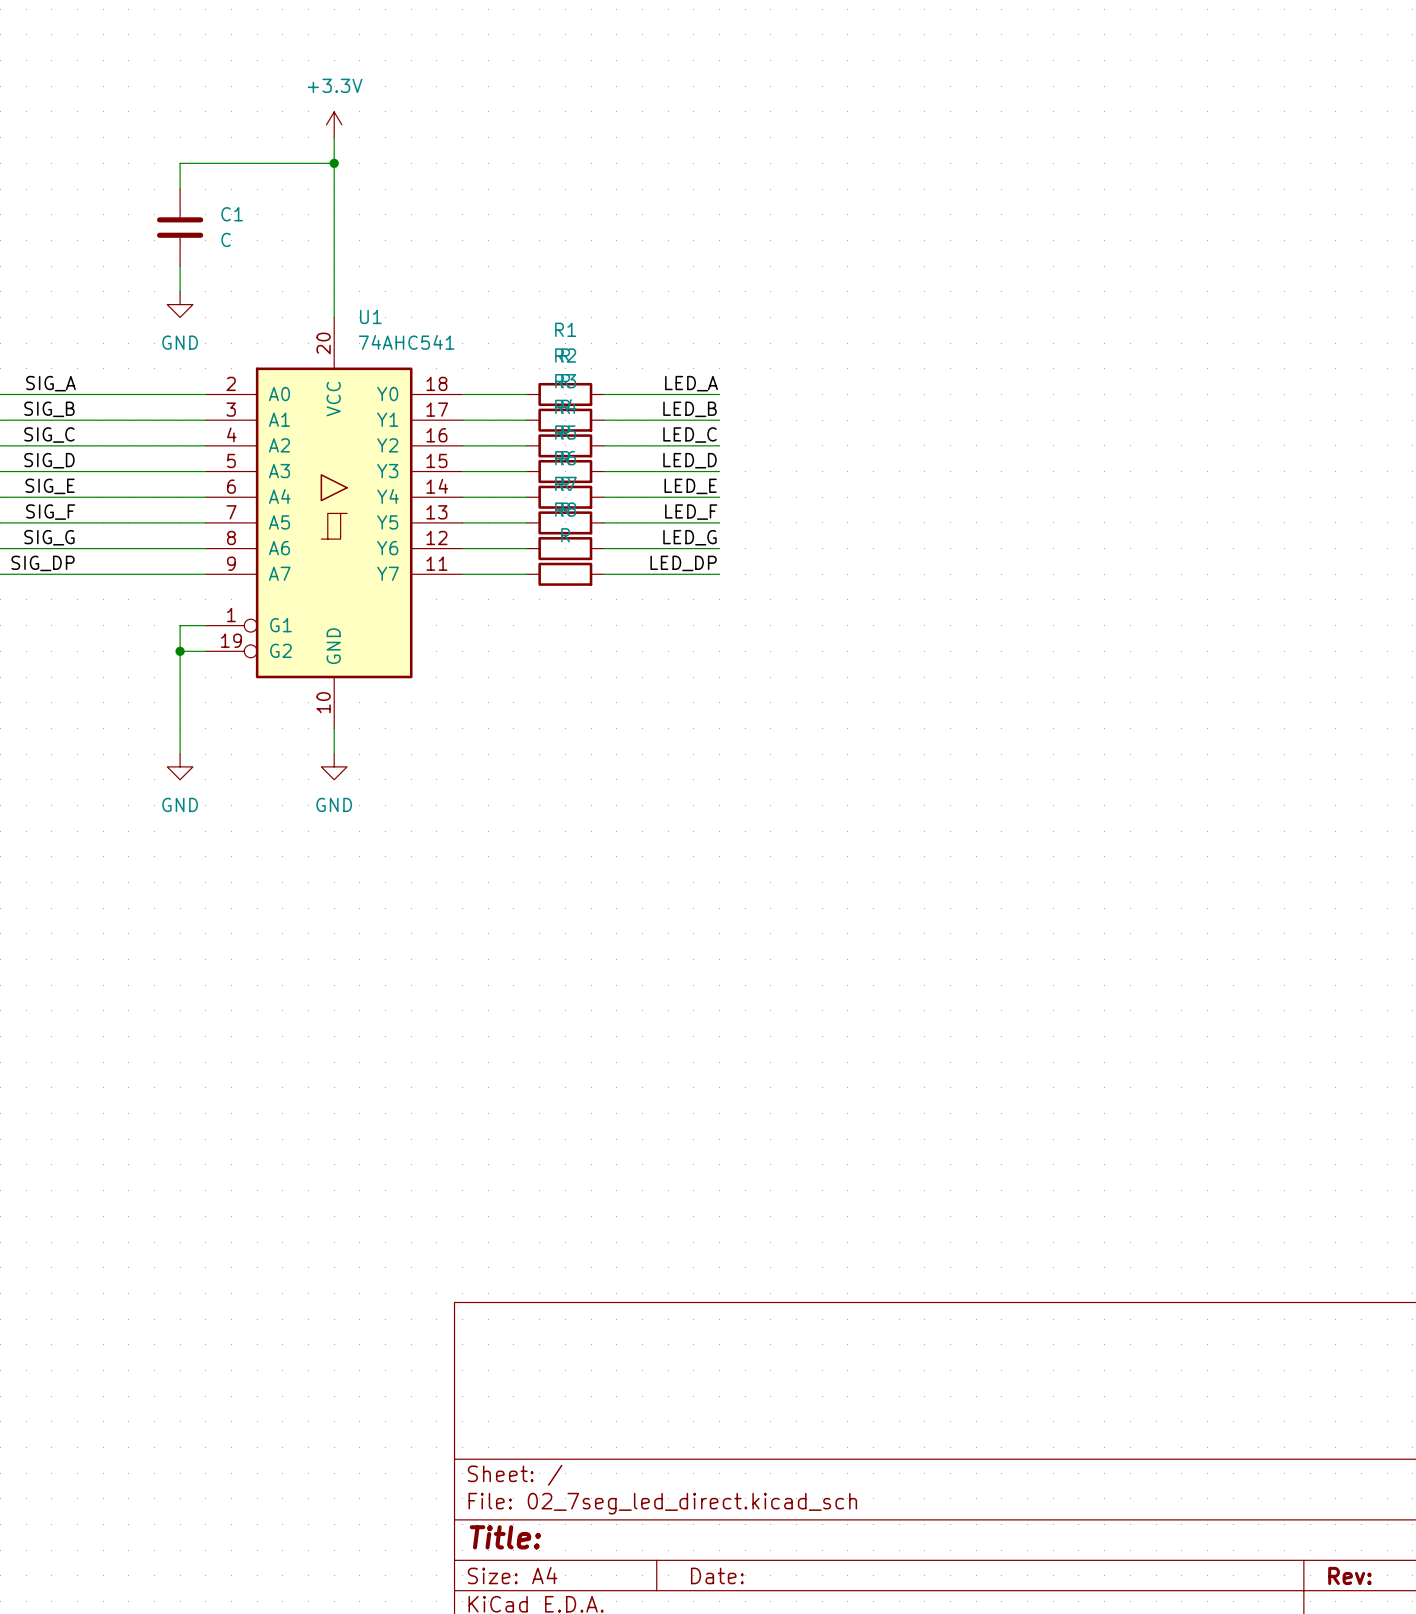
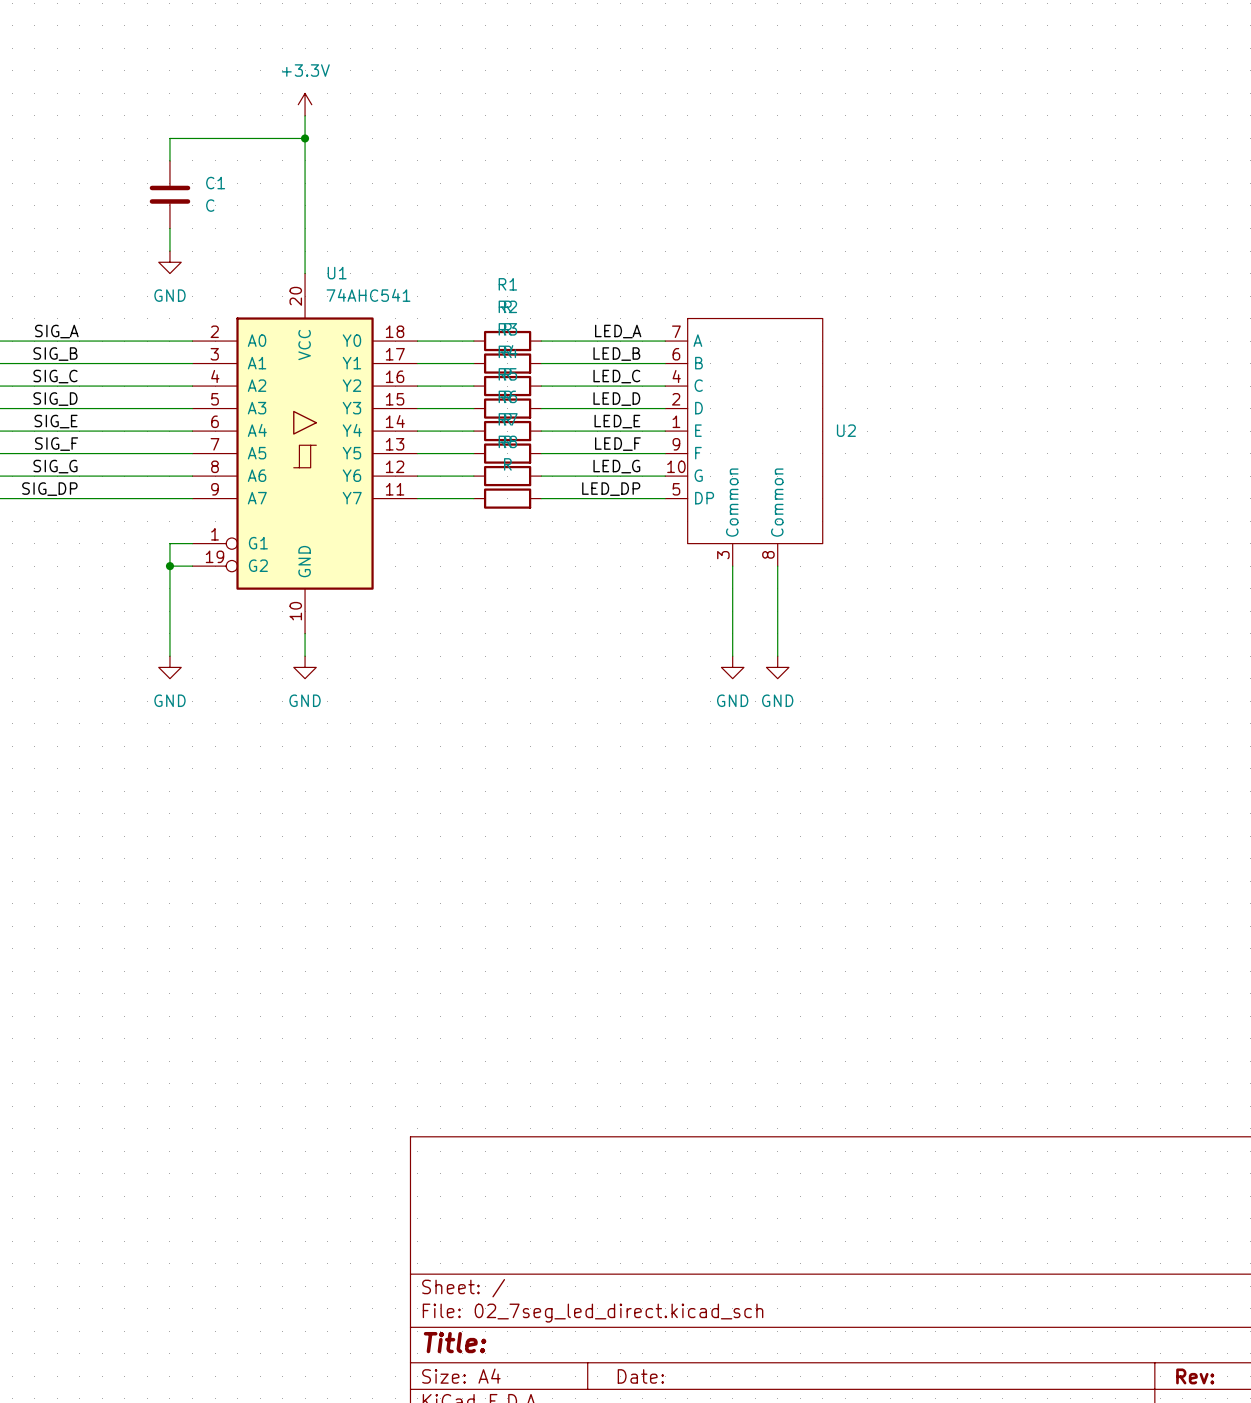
wire: none -> (642, 341) (665, 341)
wire: none -> (642, 363) (665, 363)
wire: none -> (642, 386) (665, 386)
wire: none -> (642, 408) (665, 408)
wire: none -> (642, 431) (665, 431)
U2: none -> (743, 442)
wire: none -> (642, 453) (665, 453)
wire: none -> (642, 476) (665, 476)
wire: none -> (642, 498) (665, 498)
wire: none -> (732, 566) (732, 656)
wire: none -> (777, 566) (777, 656)
power symbol: none -> GND (732, 667)
power symbol: none -> GND (777, 667)

